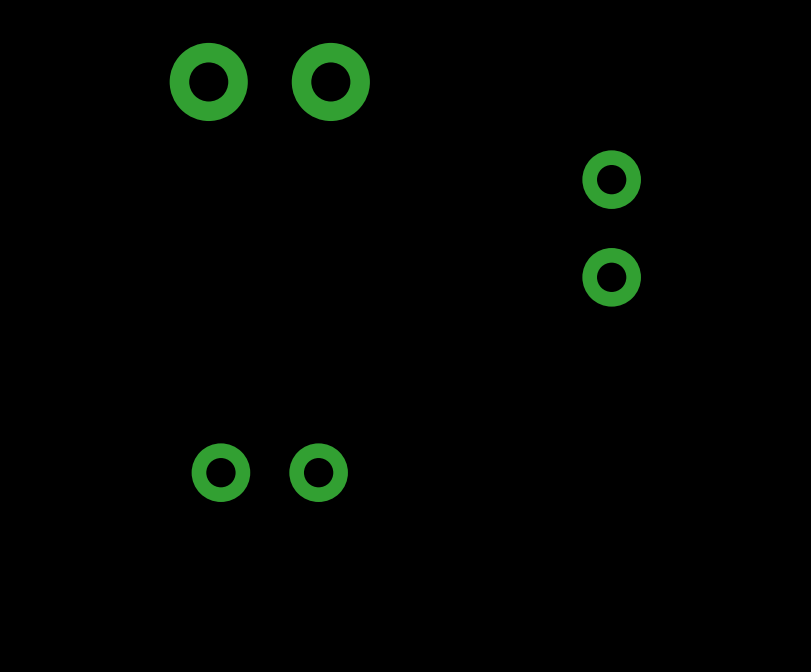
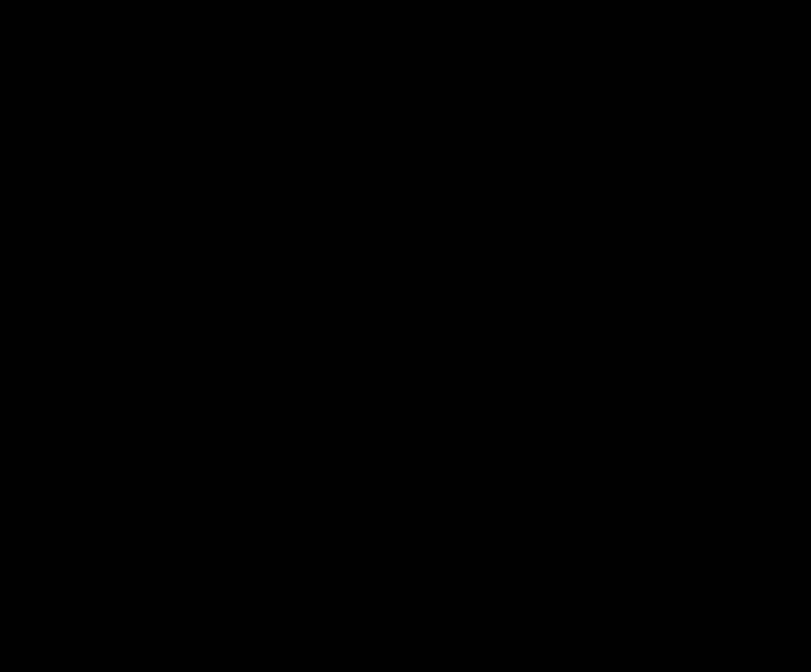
part: (269, 81) -> none
part: (611, 228) -> none
part: (269, 472) -> none

